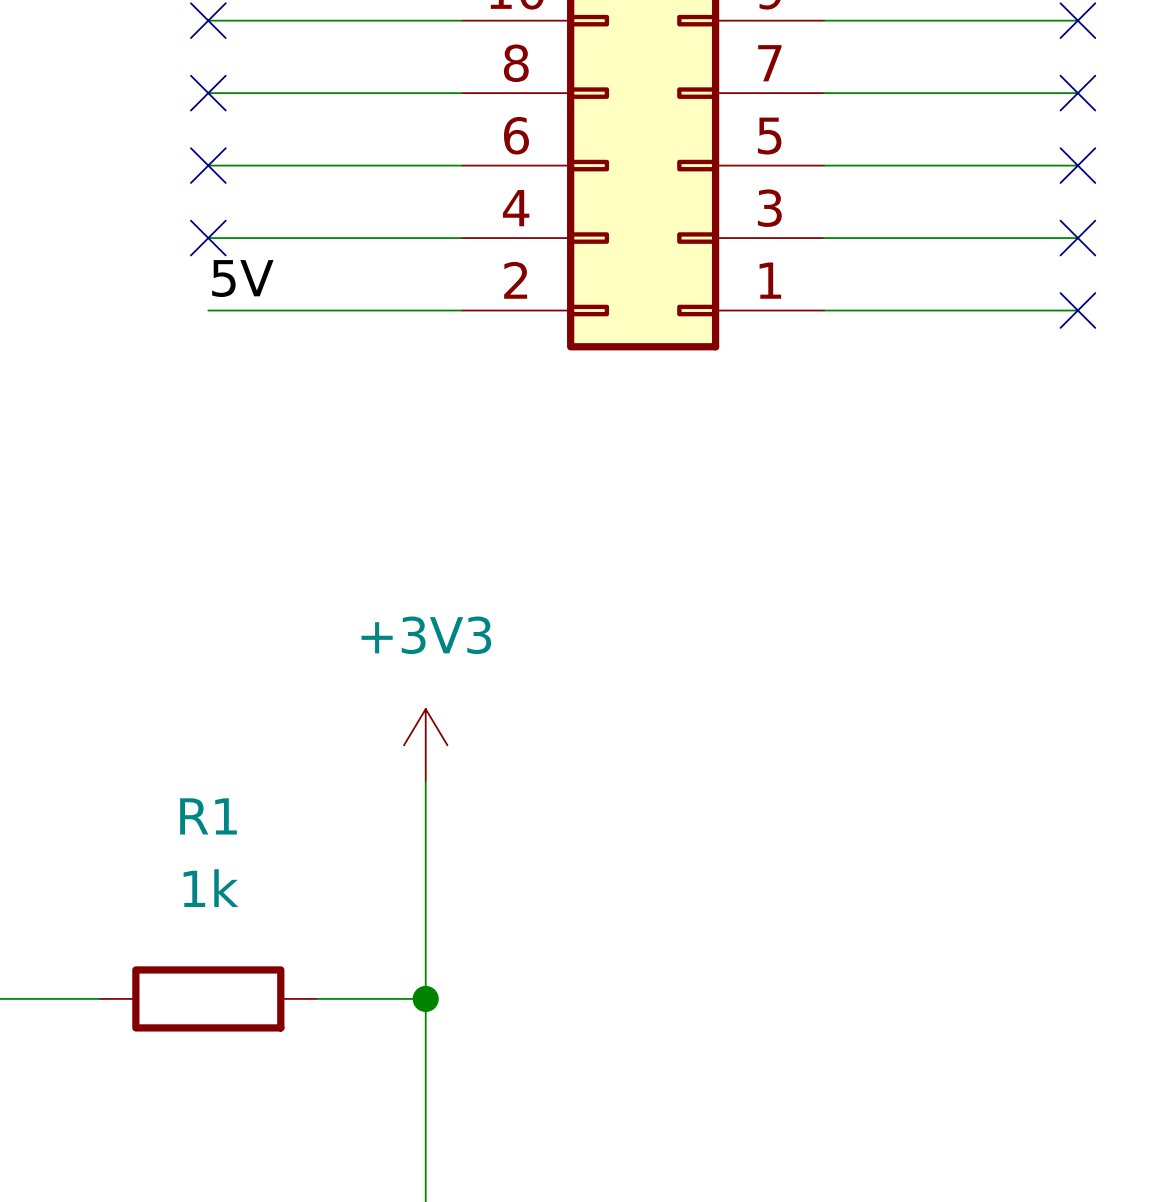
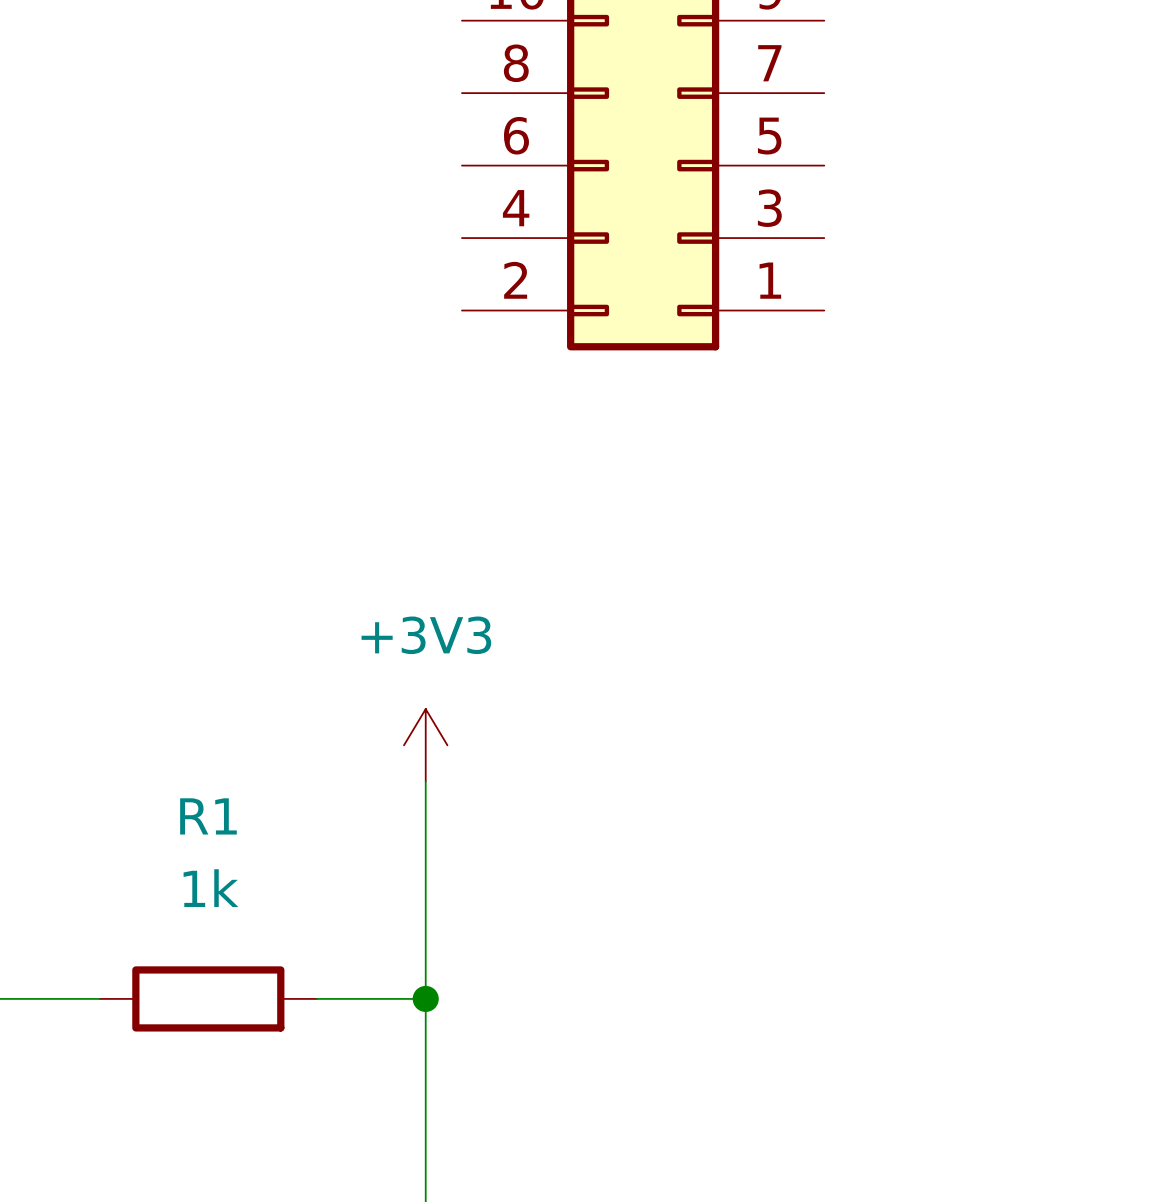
wire: (208, 20) (461, 20) -> none
no-connect mark: (208, 20) -> none
wire: (824, 20) (1077, 20) -> none
no-connect mark: (1077, 20) -> none
wire: (208, 93) (461, 93) -> none
no-connect mark: (208, 93) -> none
wire: (824, 93) (1077, 93) -> none
no-connect mark: (1077, 93) -> none
wire: (208, 165) (461, 165) -> none
no-connect mark: (208, 165) -> none
wire: (824, 165) (1077, 165) -> none
no-connect mark: (1077, 165) -> none
wire: (208, 238) (461, 238) -> none
no-connect mark: (208, 238) -> none
wire: (824, 238) (1077, 238) -> none
no-connect mark: (1077, 238) -> none
label: 5V (242, 278) -> none
wire: (208, 310) (461, 310) -> none
wire: (824, 310) (1077, 310) -> none
no-connect mark: (1077, 310) -> none

